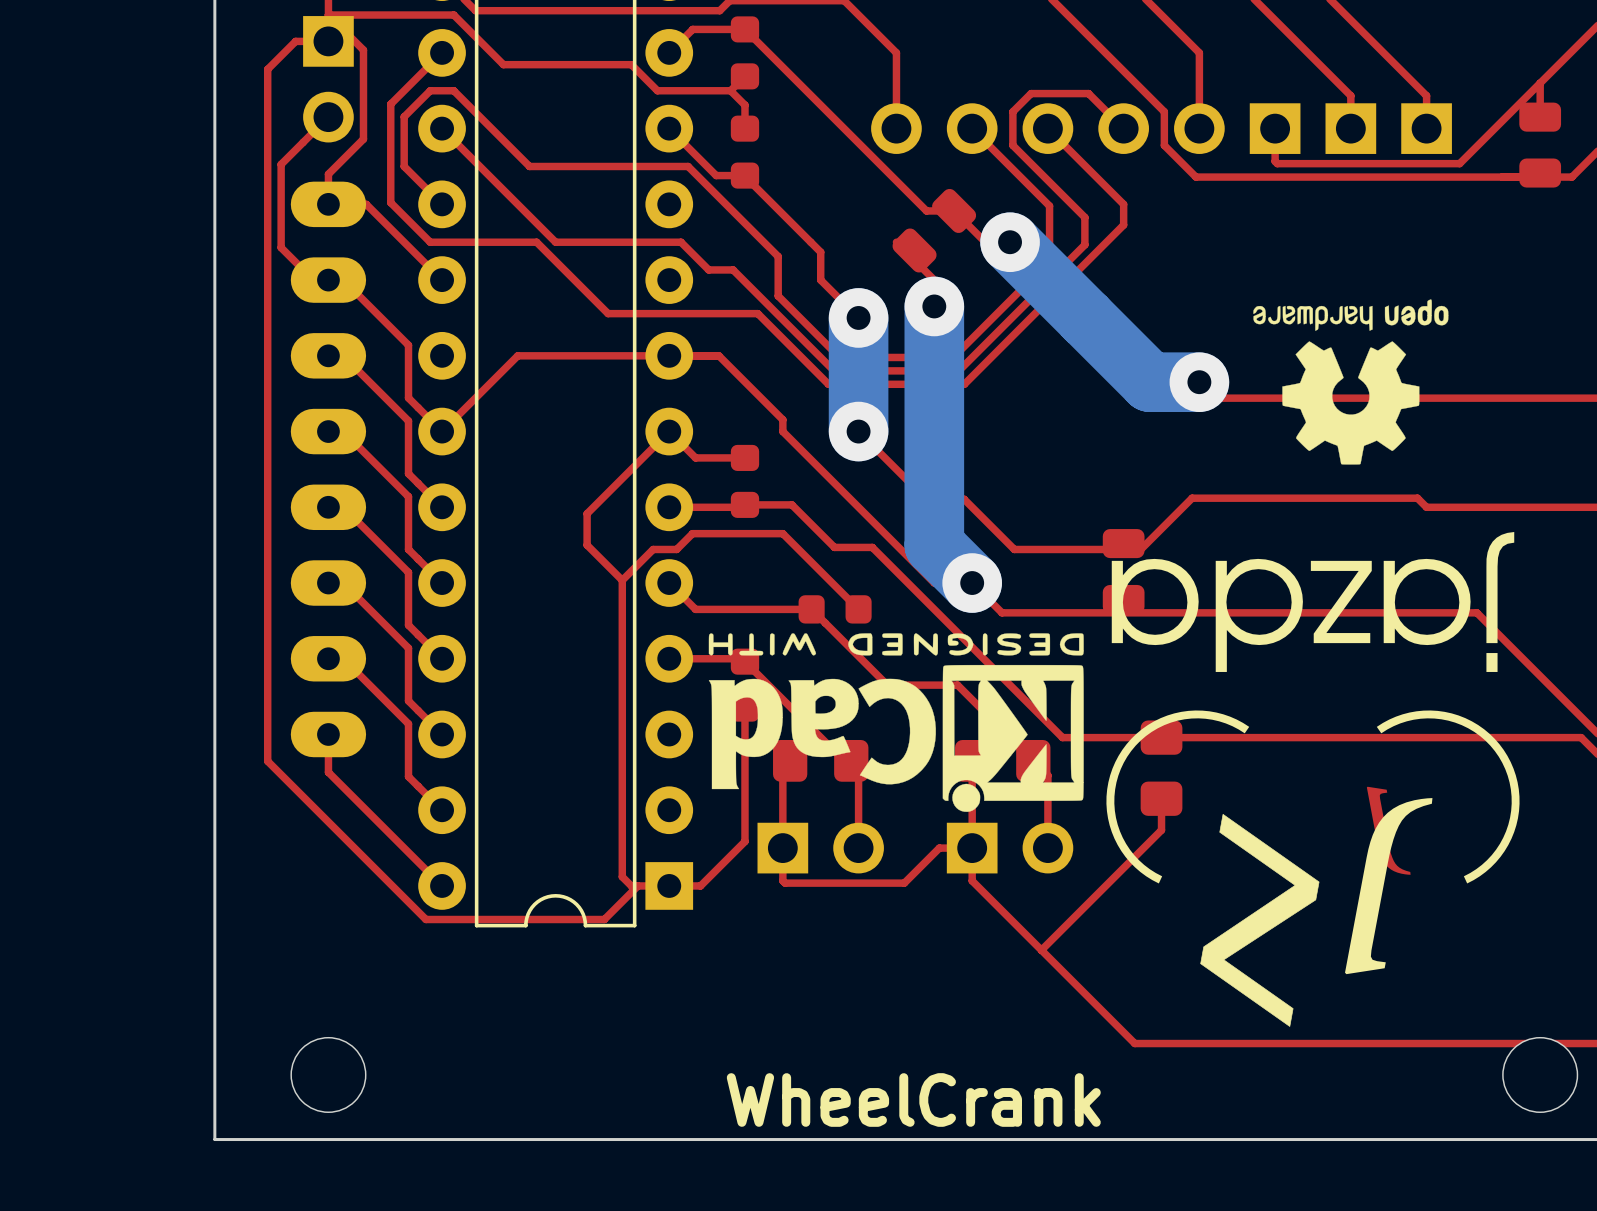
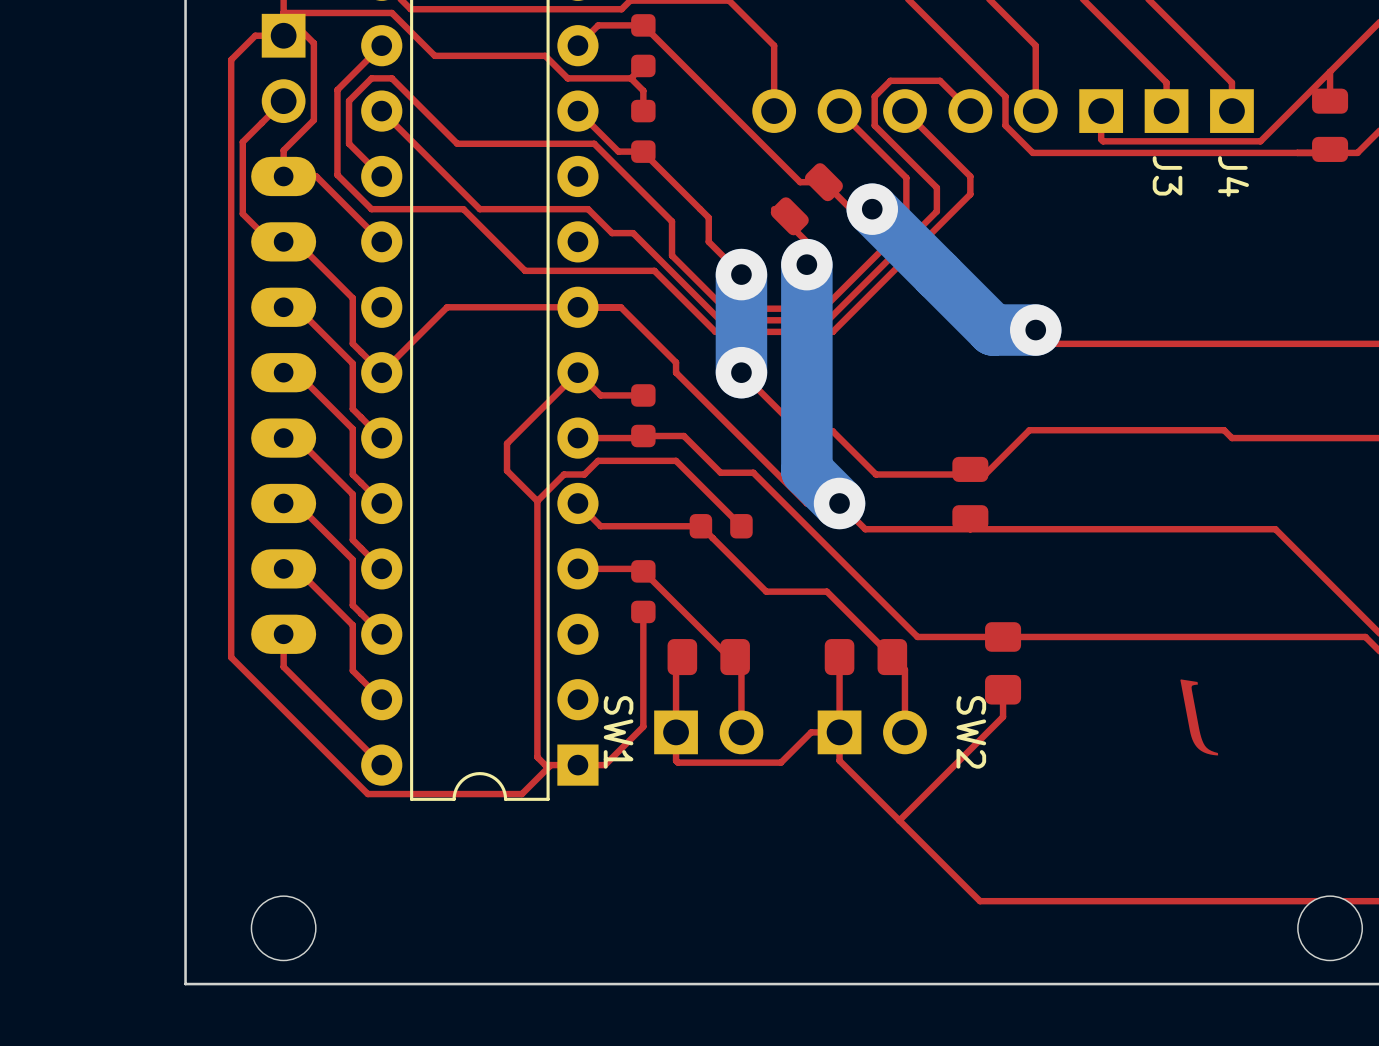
J3 name: none -> J3 (1167, 175)
J4 name: none -> J4 (1233, 176)
drawing: [1253, 299, 1449, 465] -> none
drawing: [708, 531, 1520, 1066] -> none
SW1 name: none -> SW1 (618, 732)
SW2 name: none -> SW2 (971, 732)
text: Wheel (820, 1099) -> none
text: Crank (1010, 1099) -> none

